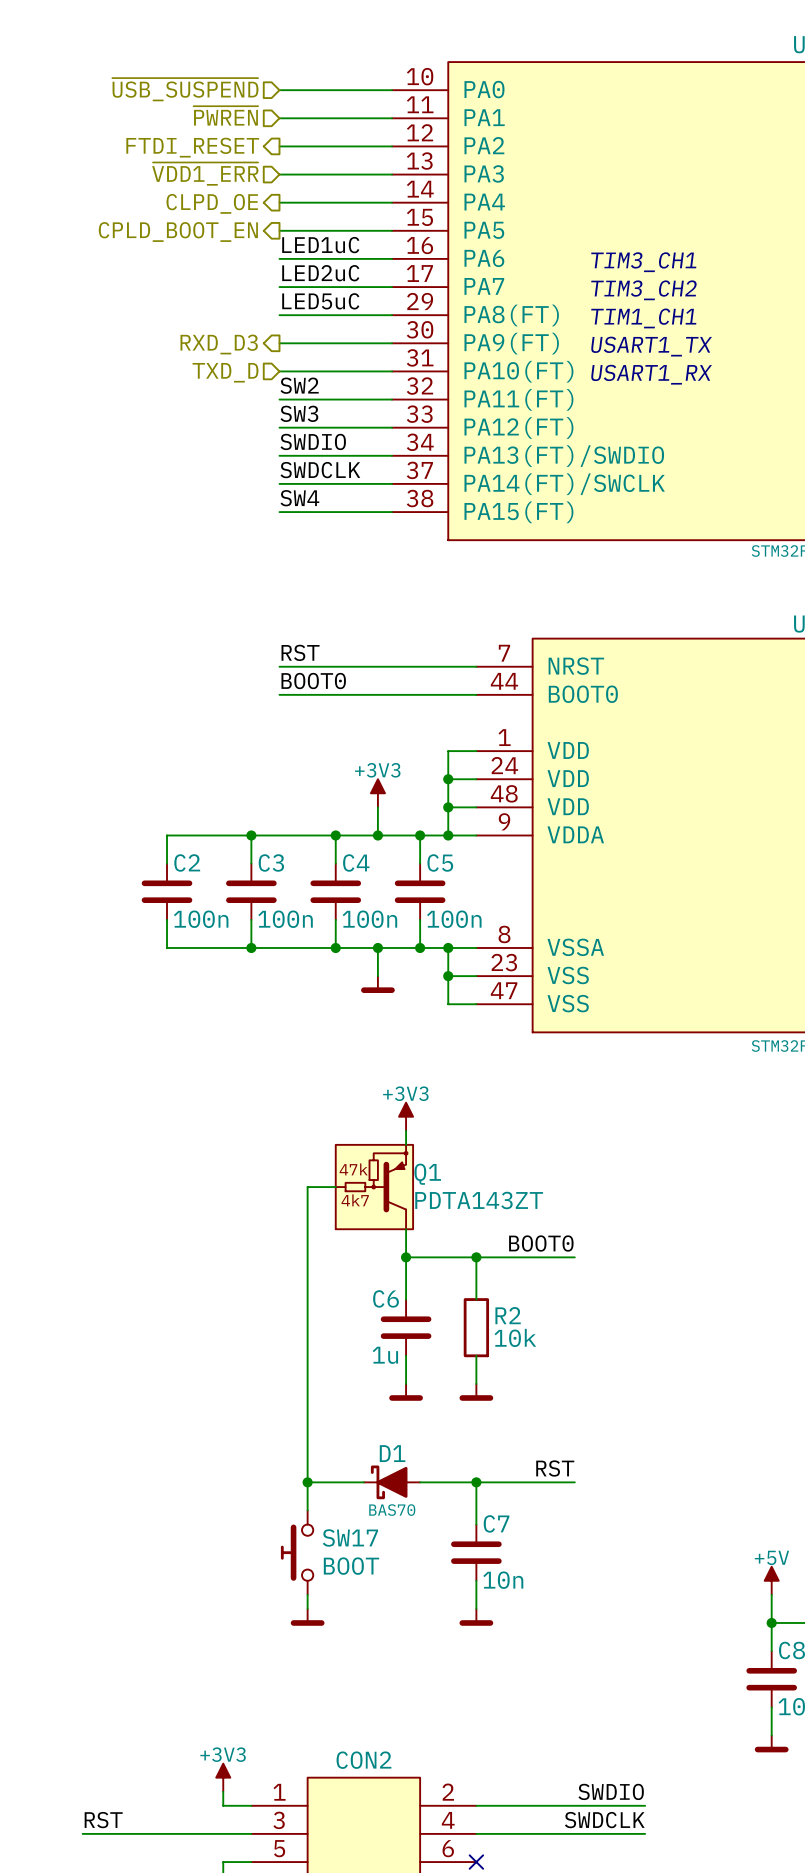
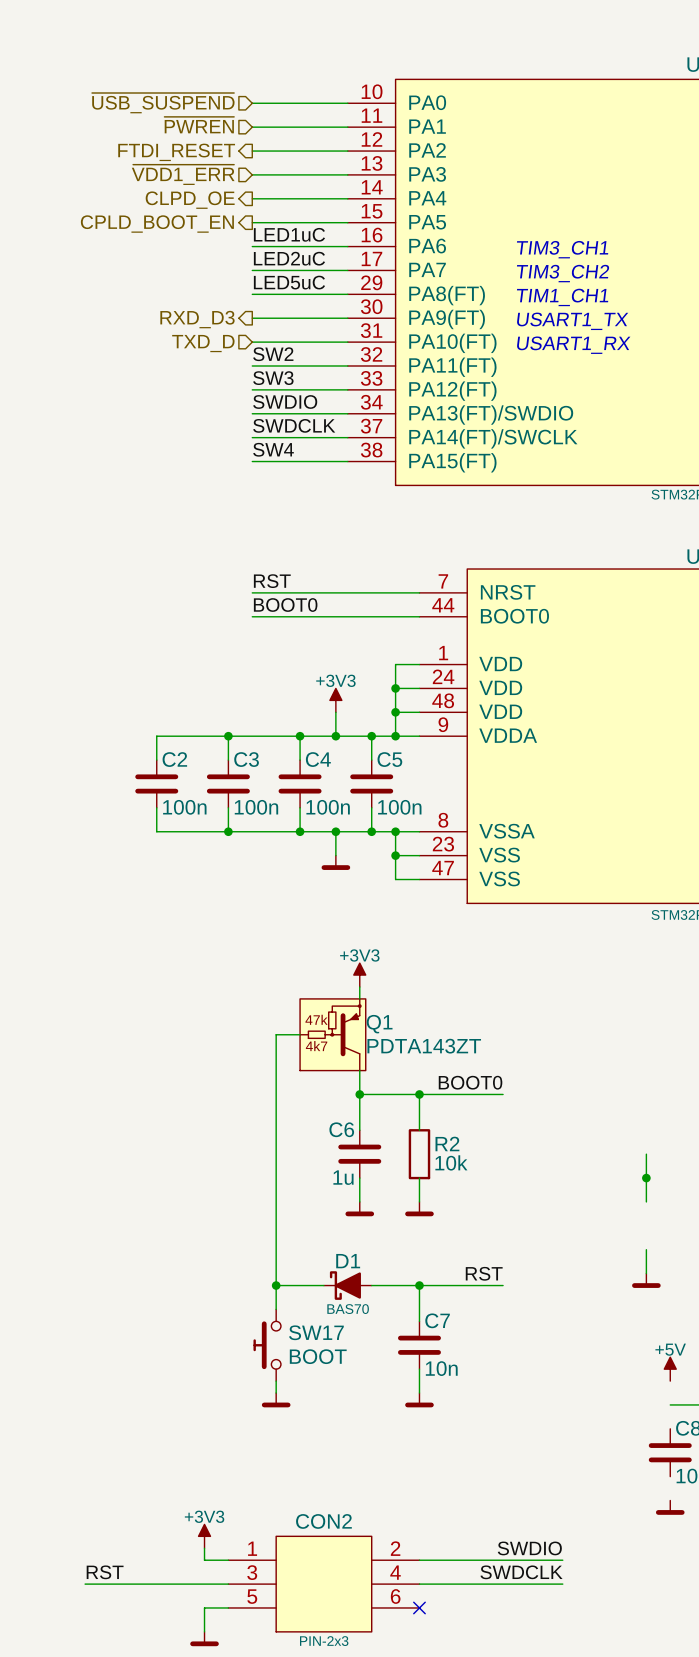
junction: none -> (646, 1178)
power symbol: none -> (646, 1280)
wire: (771, 1594) (771, 1651) -> (646, 1154) (646, 1201)
junction: (771, 1622) -> none
wire: (771, 1707) (771, 1735) -> (646, 1249) (646, 1273)

